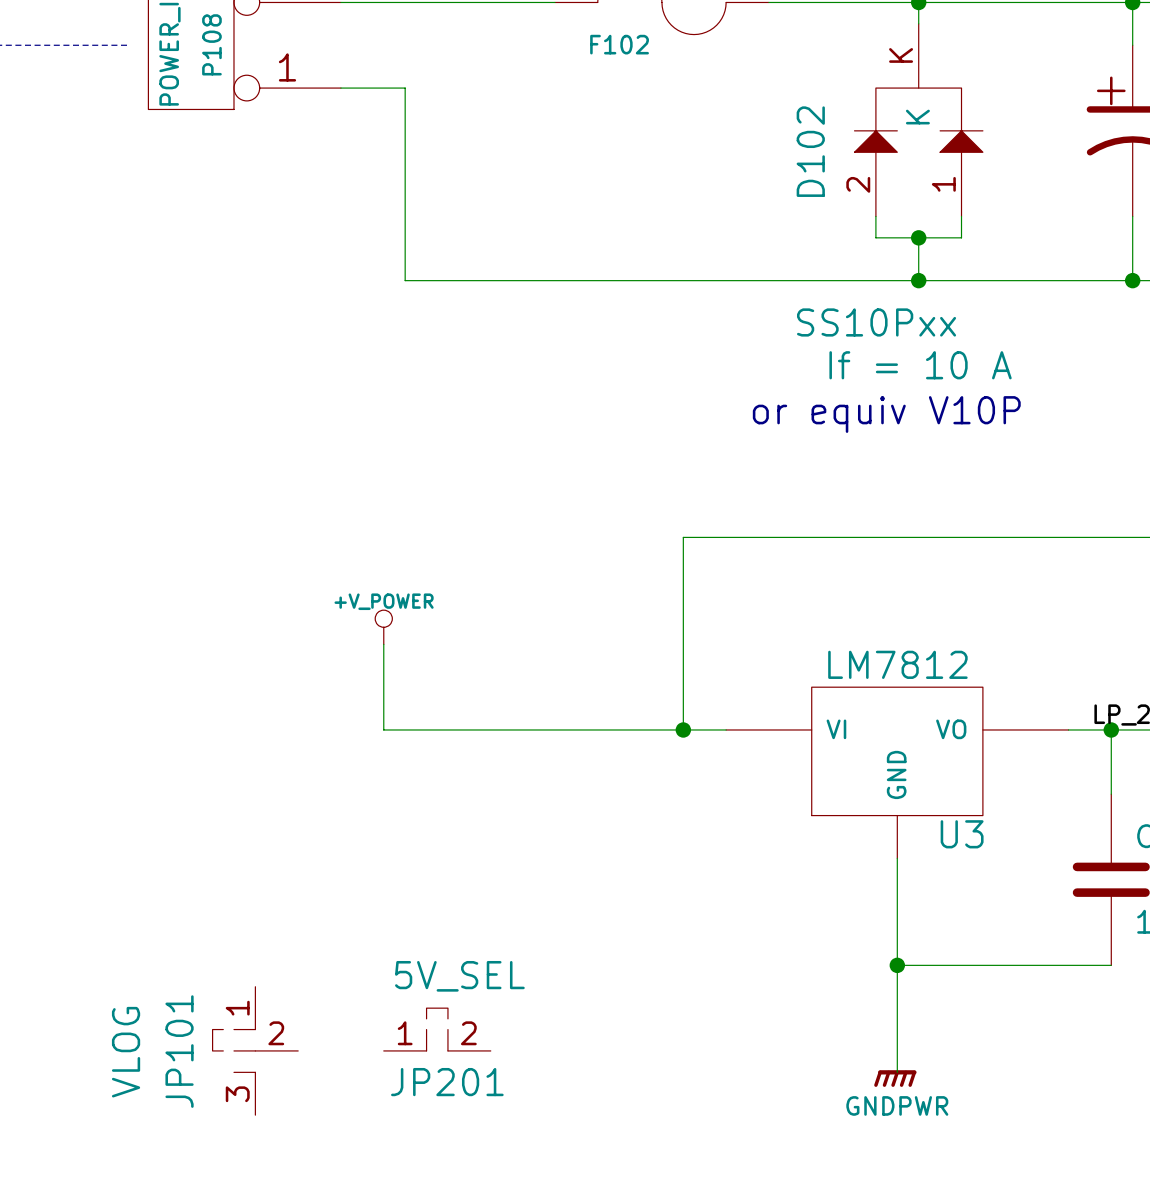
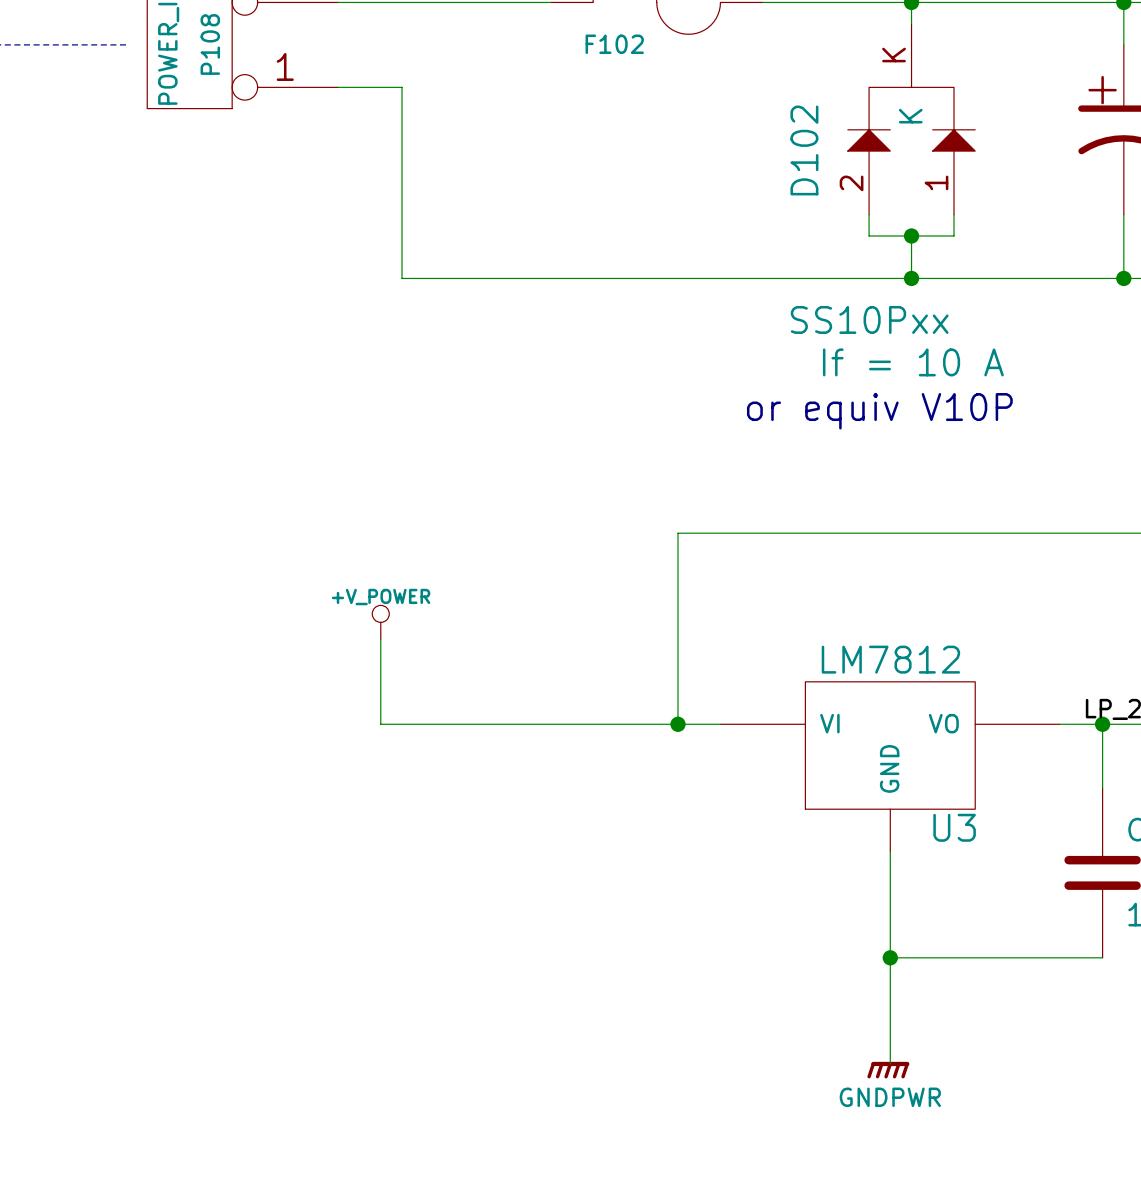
JP201: 5V_SEL (437, 1029) -> none
JP101: VLOG (255, 1050) -> none

